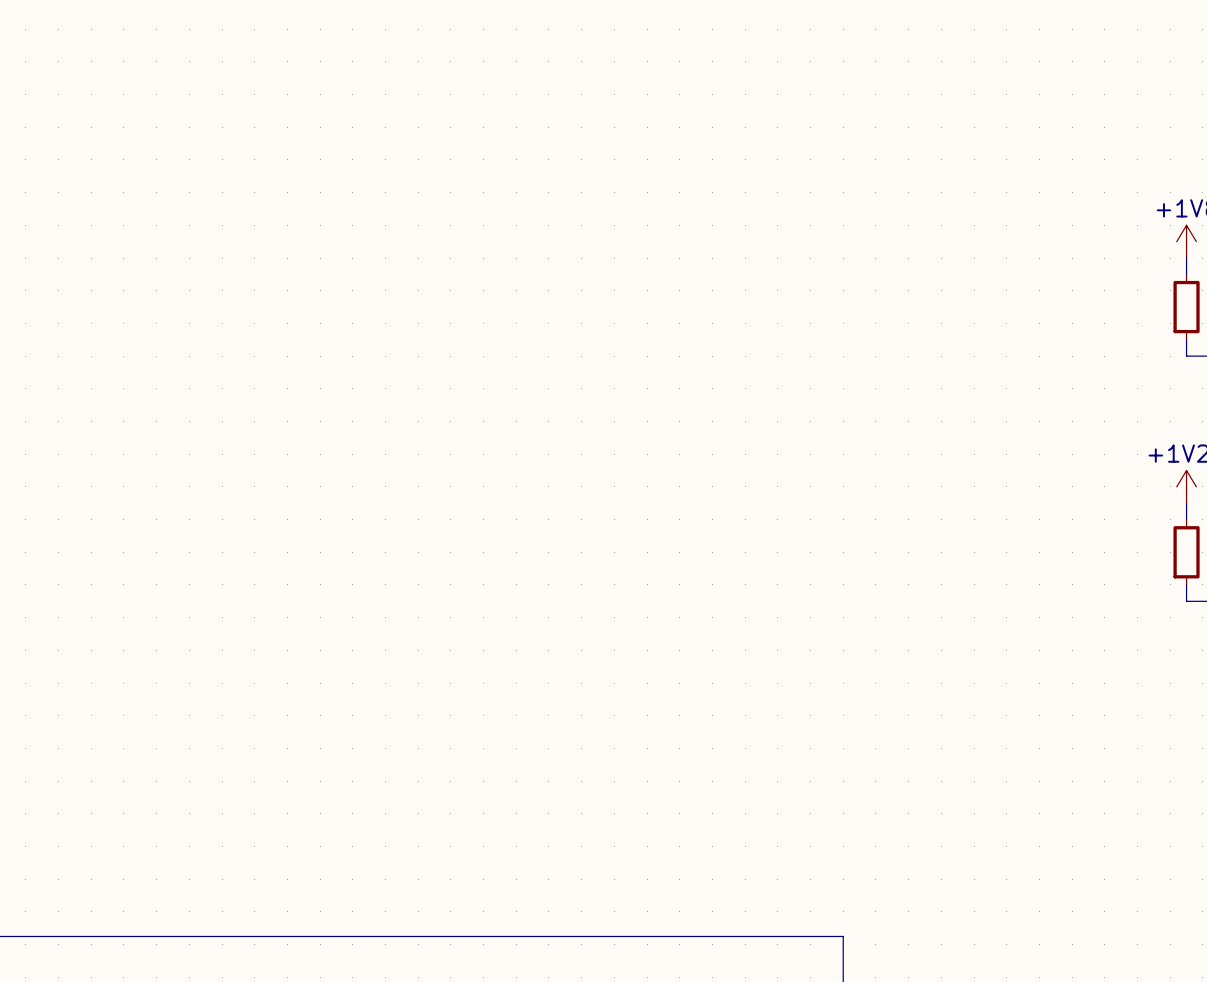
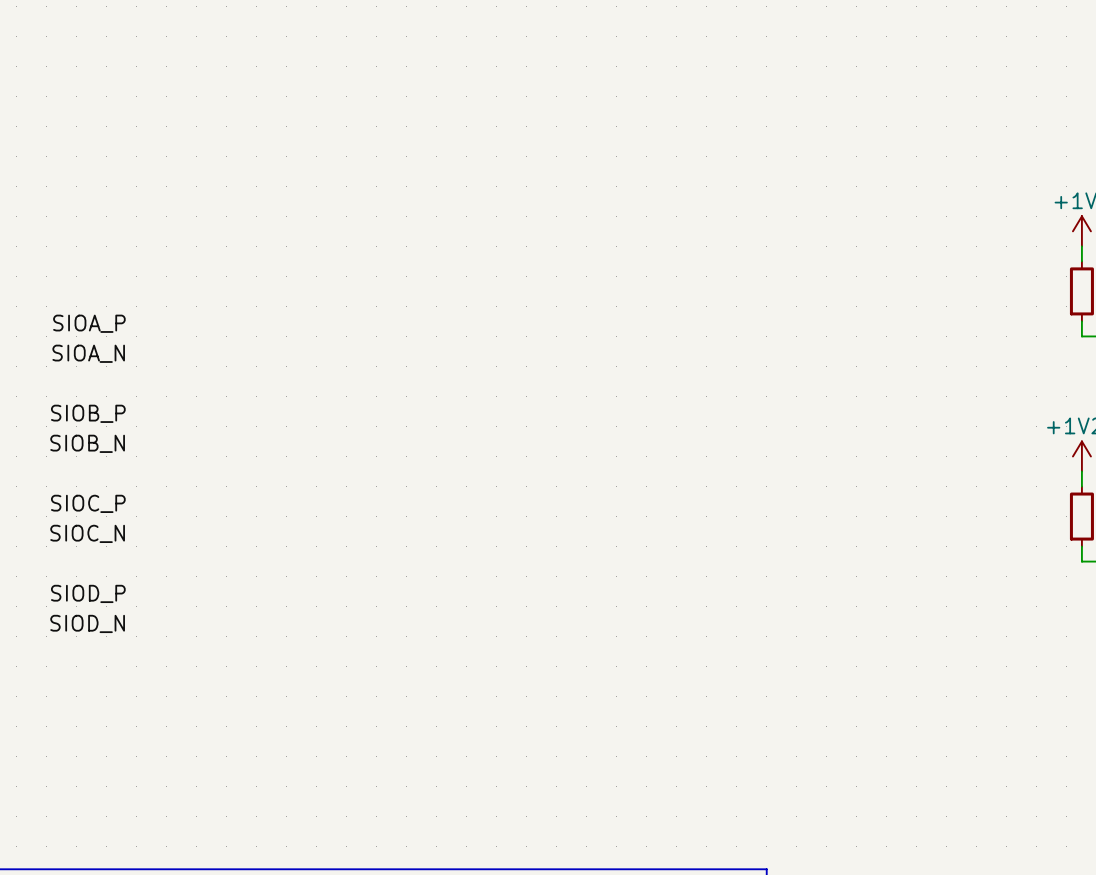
label: none -> SIOA_P (89, 323)
label: none -> SIOA_N (88, 353)
label: none -> SIOB_P (88, 413)
label: none -> SIOB_N (87, 443)
label: none -> SIOC_P (88, 503)
label: none -> SIOC_N (87, 533)
label: none -> SIOD_P (88, 593)
label: none -> SIOD_N (87, 623)

